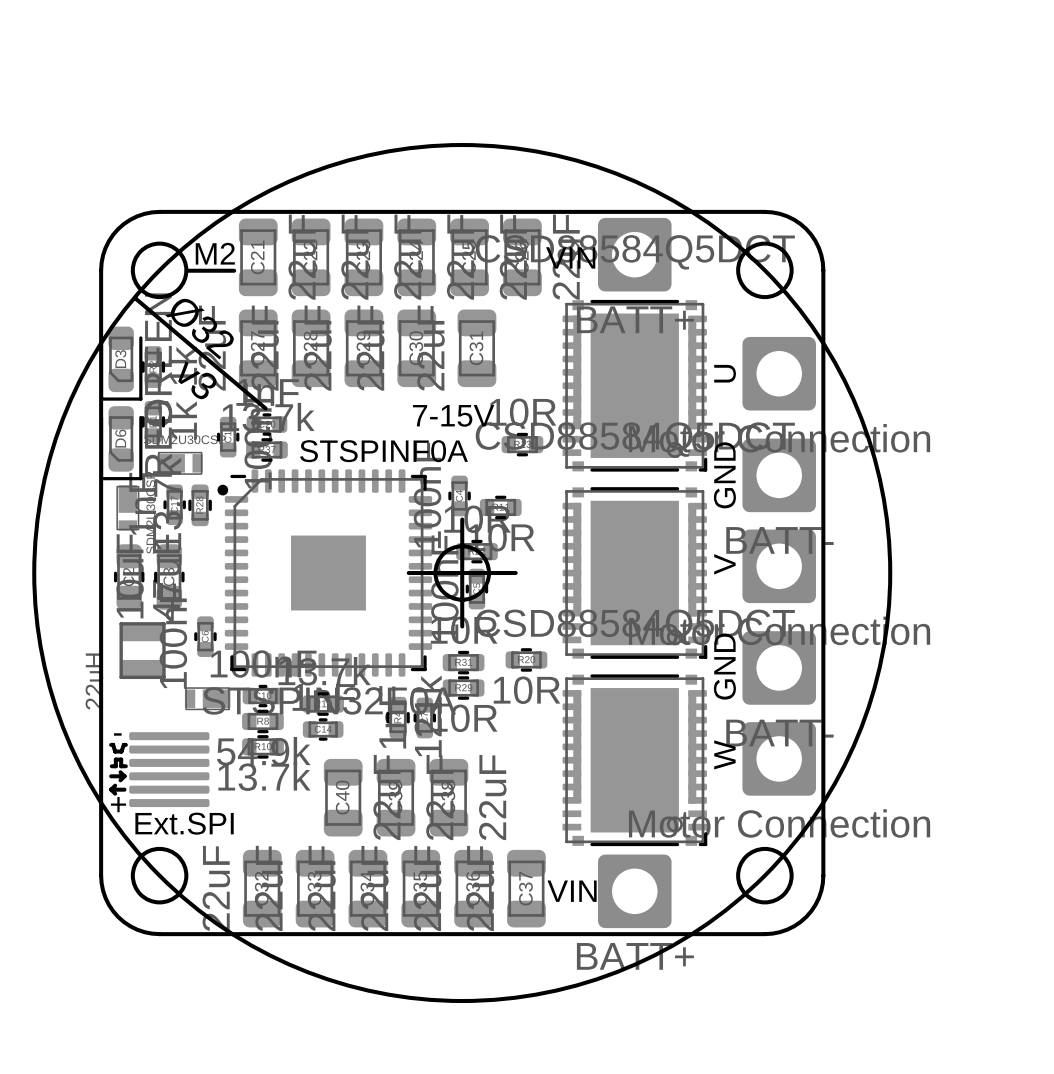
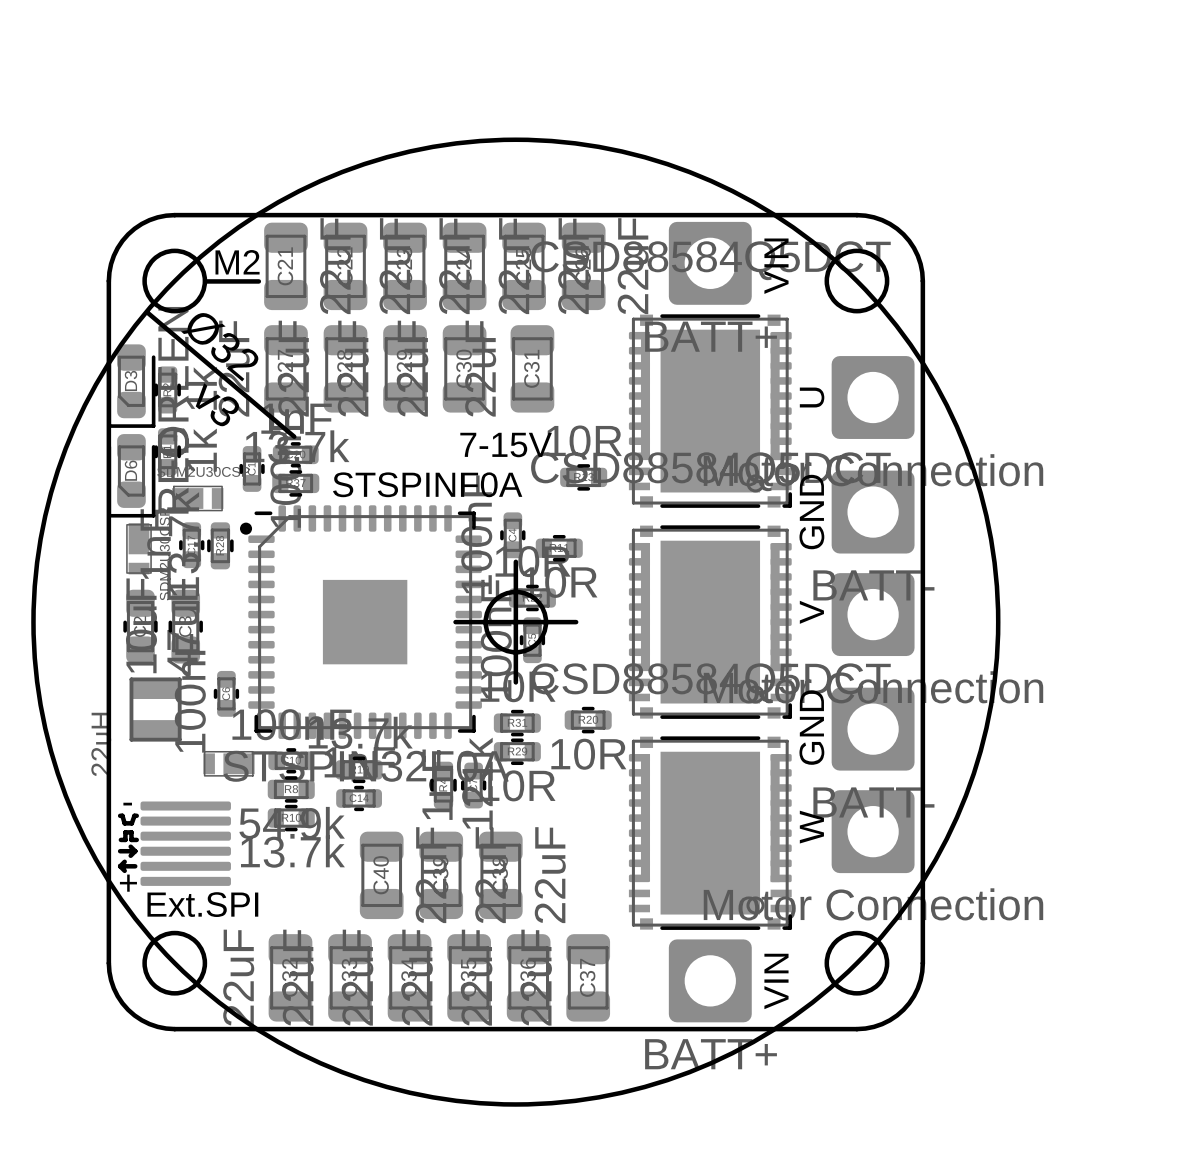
text rotation: 0° (570, 257) -> 90° counterclockwise (776, 266)
text position: VIN (570, 257) -> VIN (776, 266)
text rotation: 0° (572, 891) -> 90° counterclockwise (776, 981)
text position: VIN (572, 891) -> VIN (776, 981)

